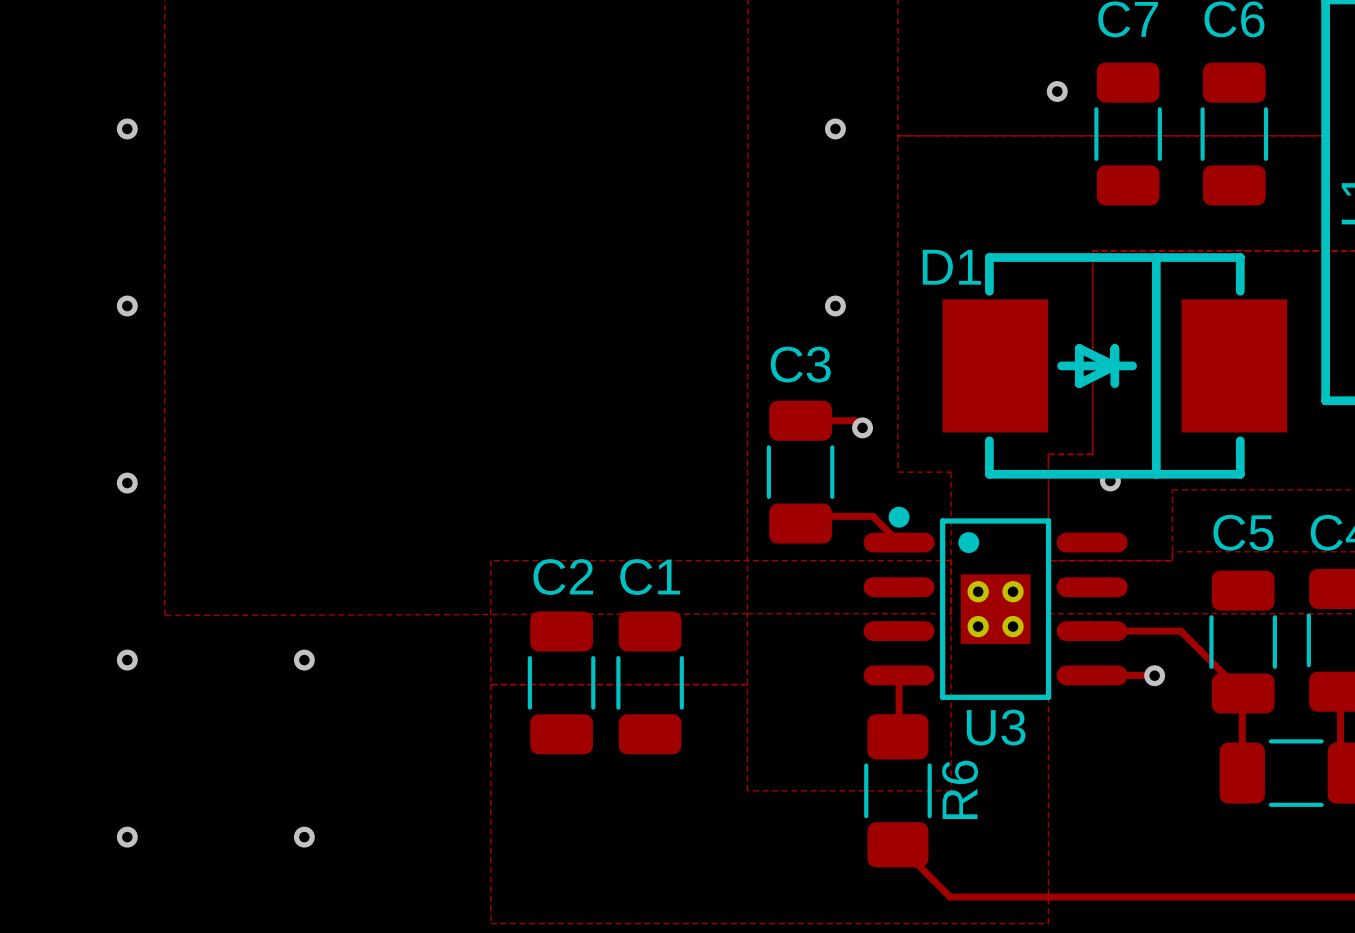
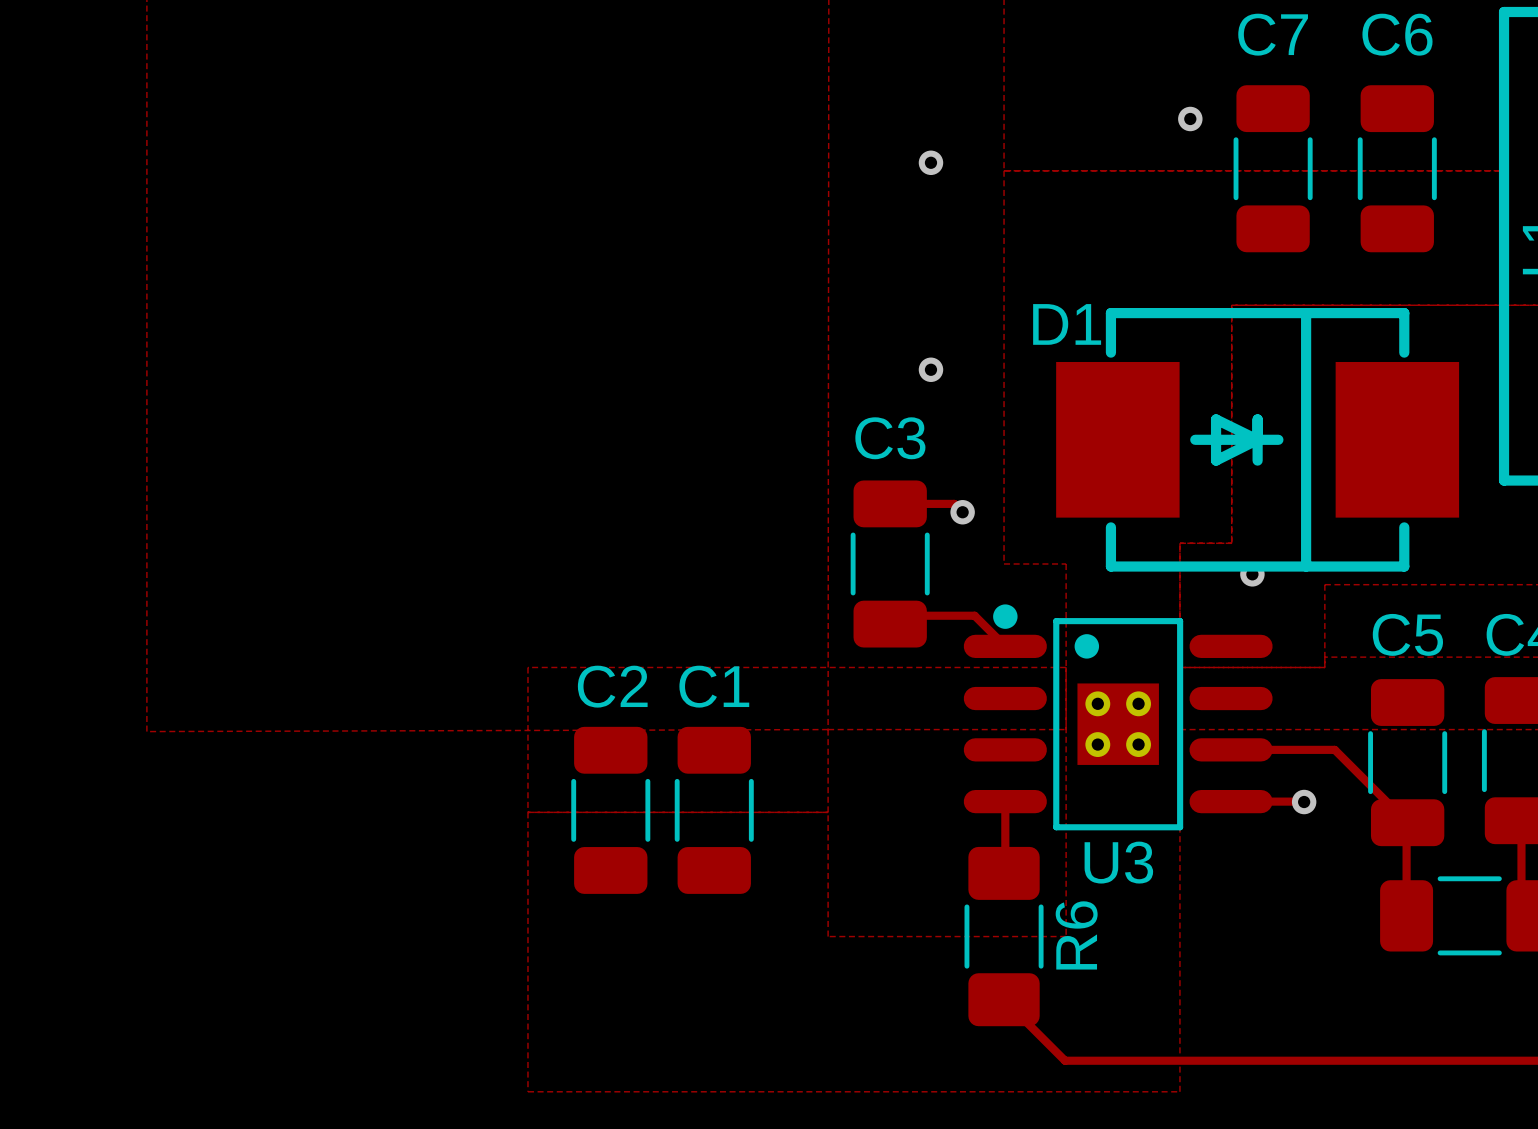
via: (127, 128) -> none
via: (127, 306) -> none
via: (127, 483) -> none
via: (127, 660) -> none
via: (304, 660) -> none
via: (127, 837) -> none
via: (304, 837) -> none

